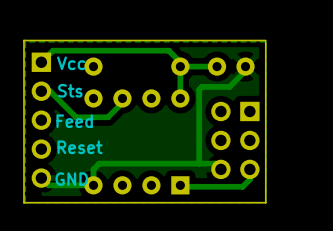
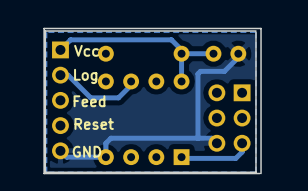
text: Sts (70, 90) -> Log (85, 76)
board edge: none -> (261, 173) (261, 28) (44, 28) (44, 173) (259, 173)

